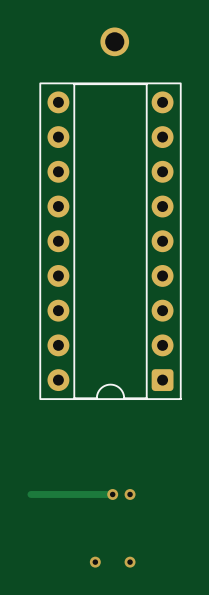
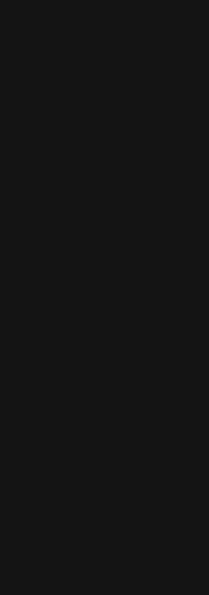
part: (114, 41) -> none
part: (110, 241) -> none
track: (30, 494) (112, 494) -> none
via: (112, 494) -> none
via: (130, 494) -> none
via: (95, 562) -> none
via: (130, 562) -> none

